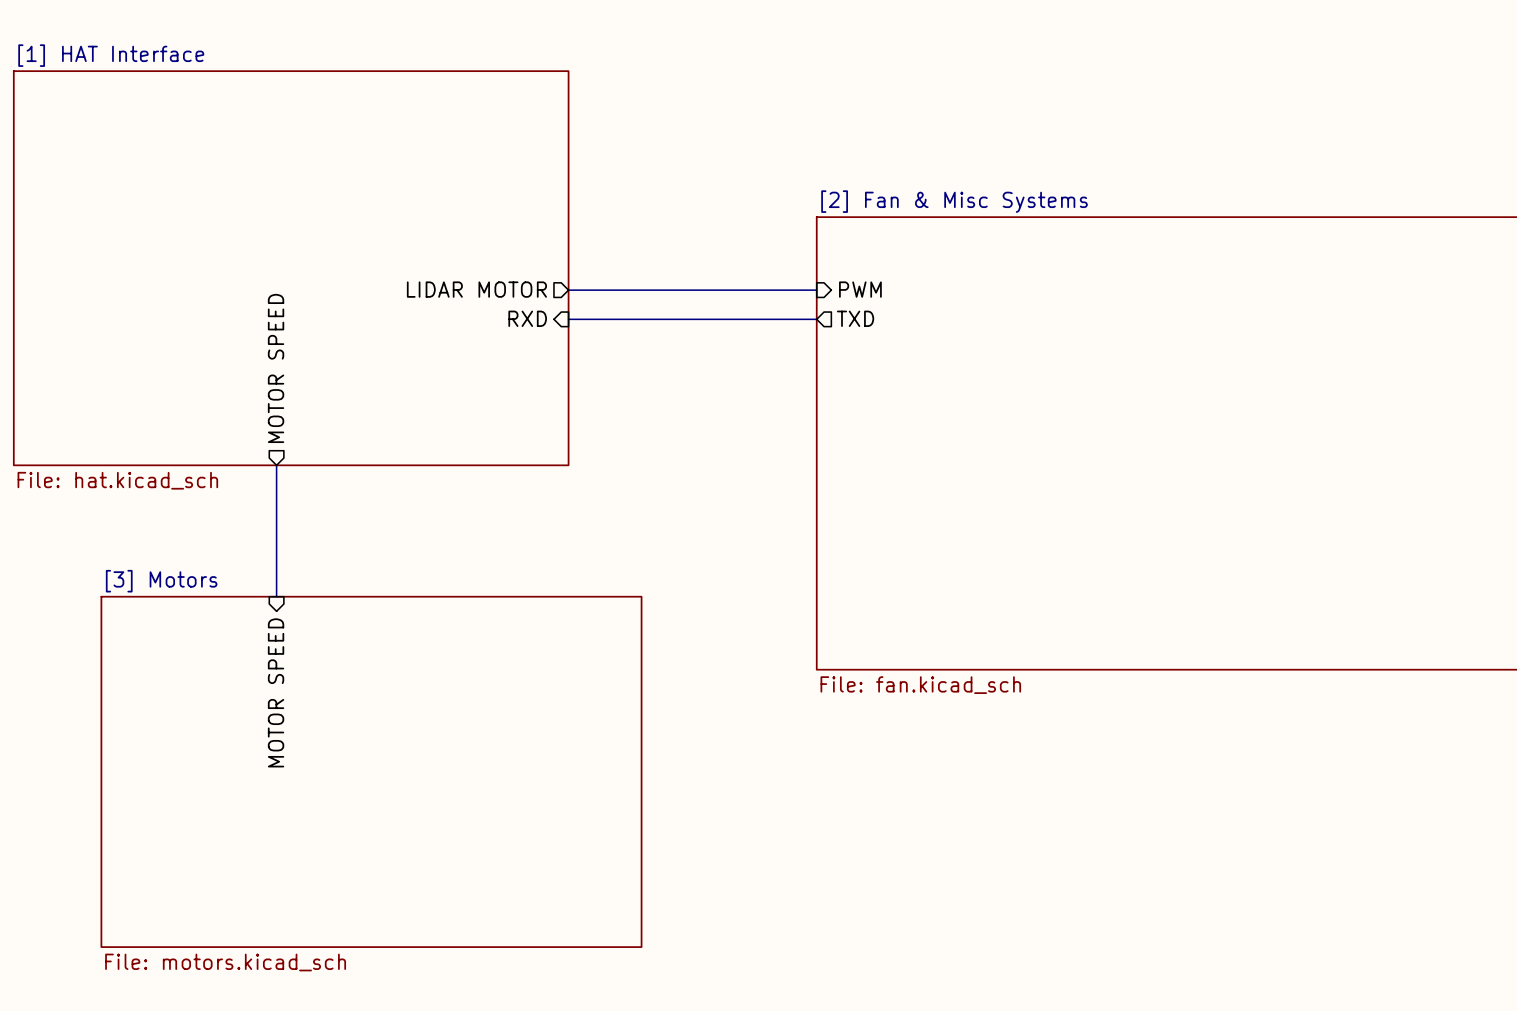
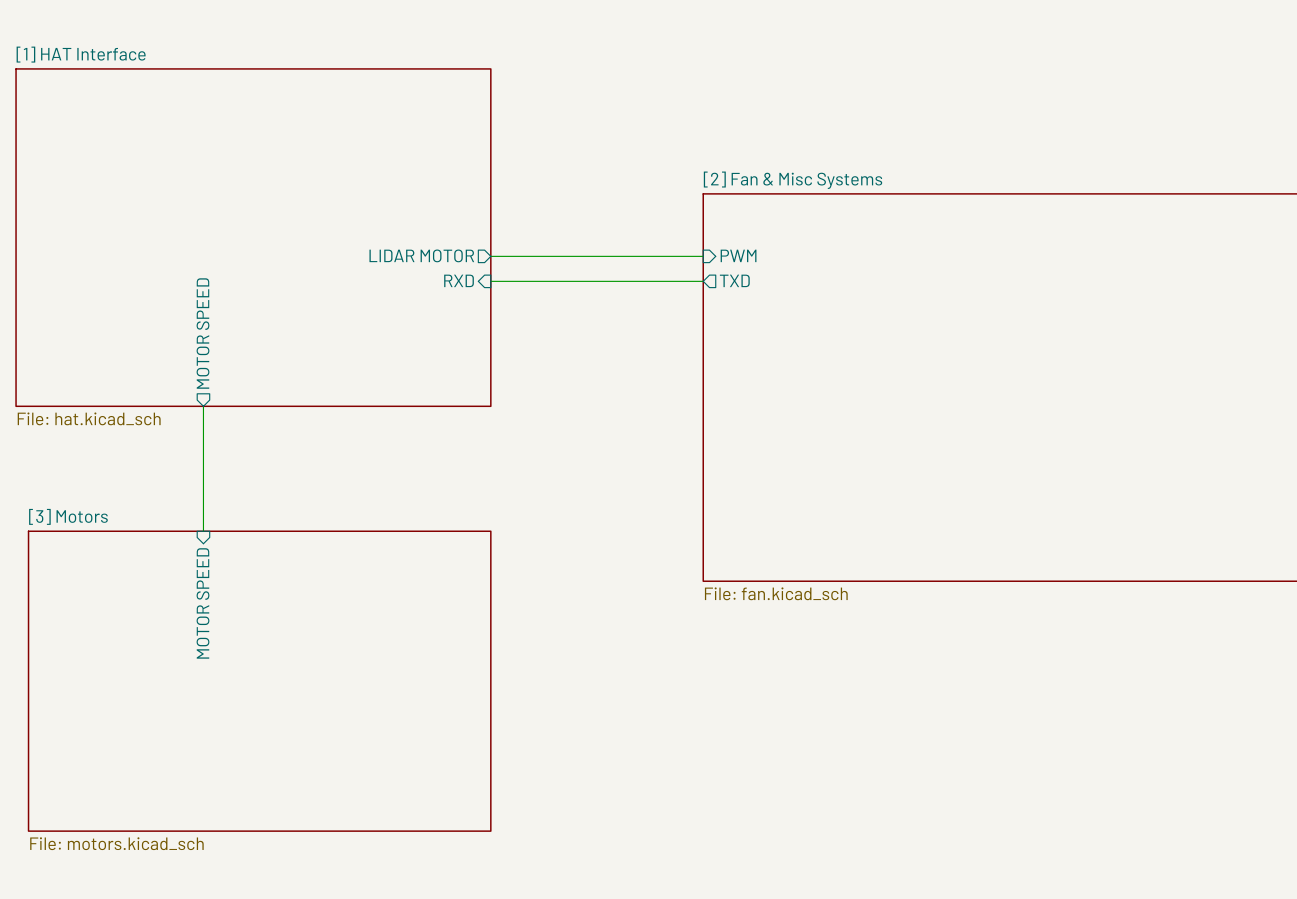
sheet pin position: MOTOR SPEED (276, 368) -> MOTOR SPEED (202, 333)
wire: none -> (203, 406) (203, 531)
wire: (276, 465) (276, 596) -> none
sheet pin position: MOTOR SPEED (276, 692) -> MOTOR SPEED (202, 603)
sheet [3] Motors position: (371, 771) -> (259, 681)

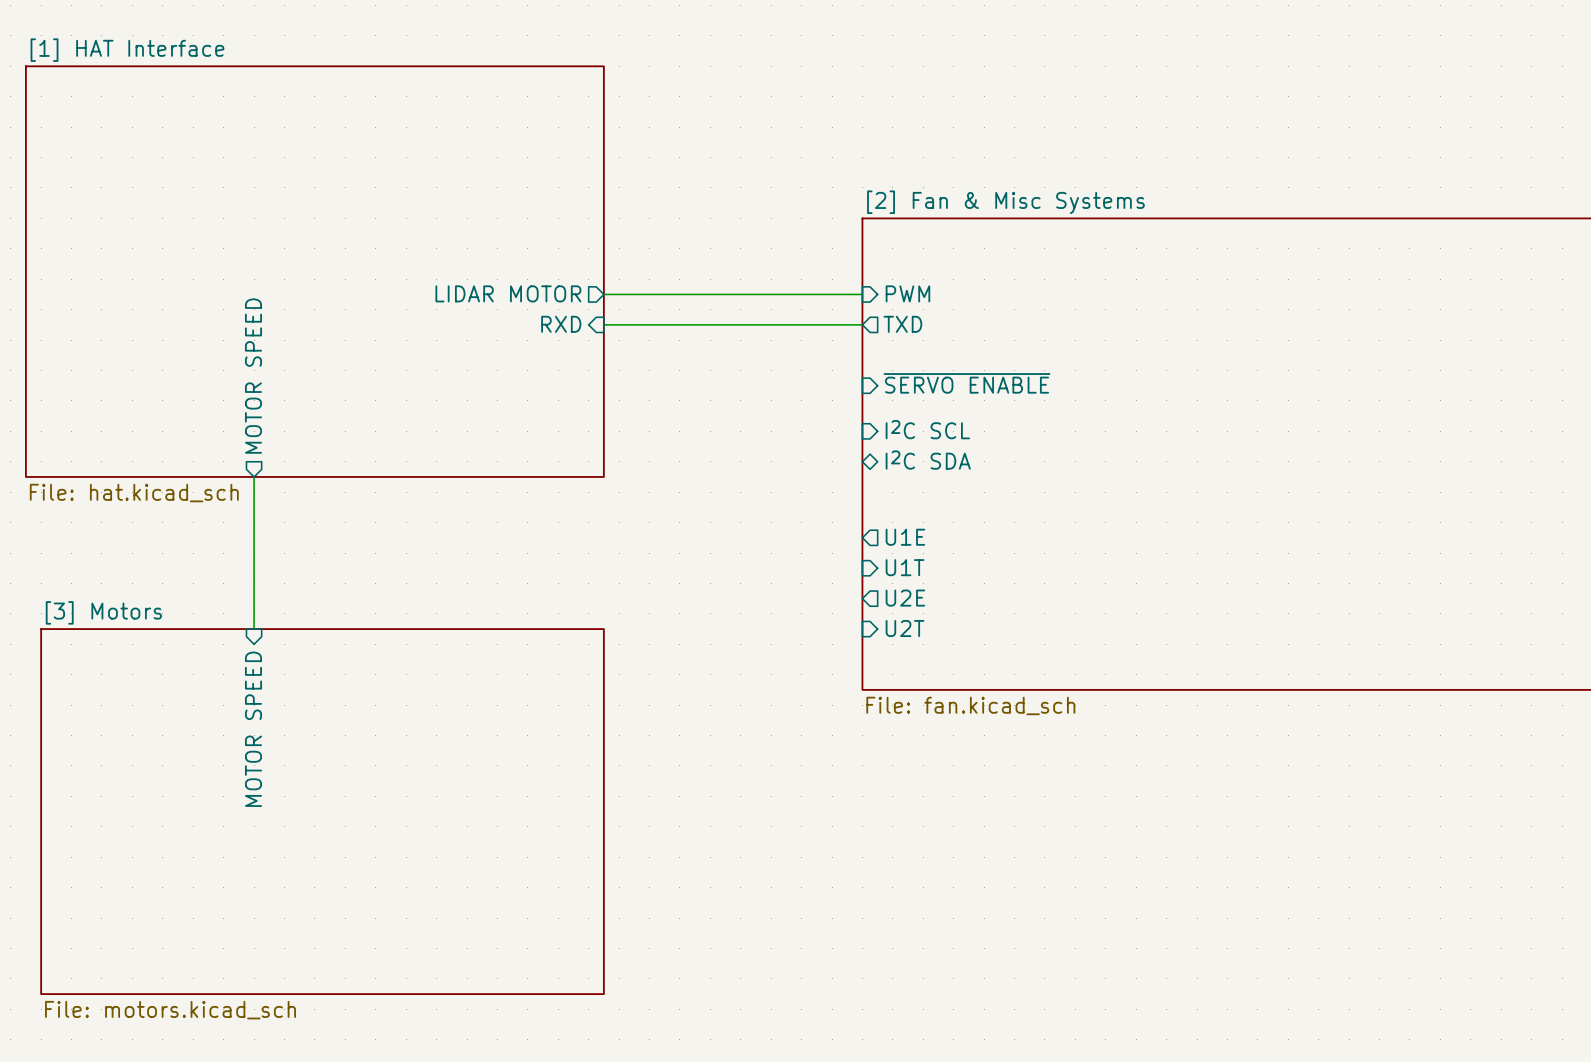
sheet pin: none -> ~{SERVO ENABLE} (966, 383)
sheet pin: none -> I2C SCL (927, 429)
sheet pin: none -> I2C SDA (928, 460)
sheet pin: none -> U1E (905, 537)
sheet pin: none -> U1T (905, 567)
sheet pin: none -> U2E (905, 598)
sheet pin: none -> U2T (905, 628)

